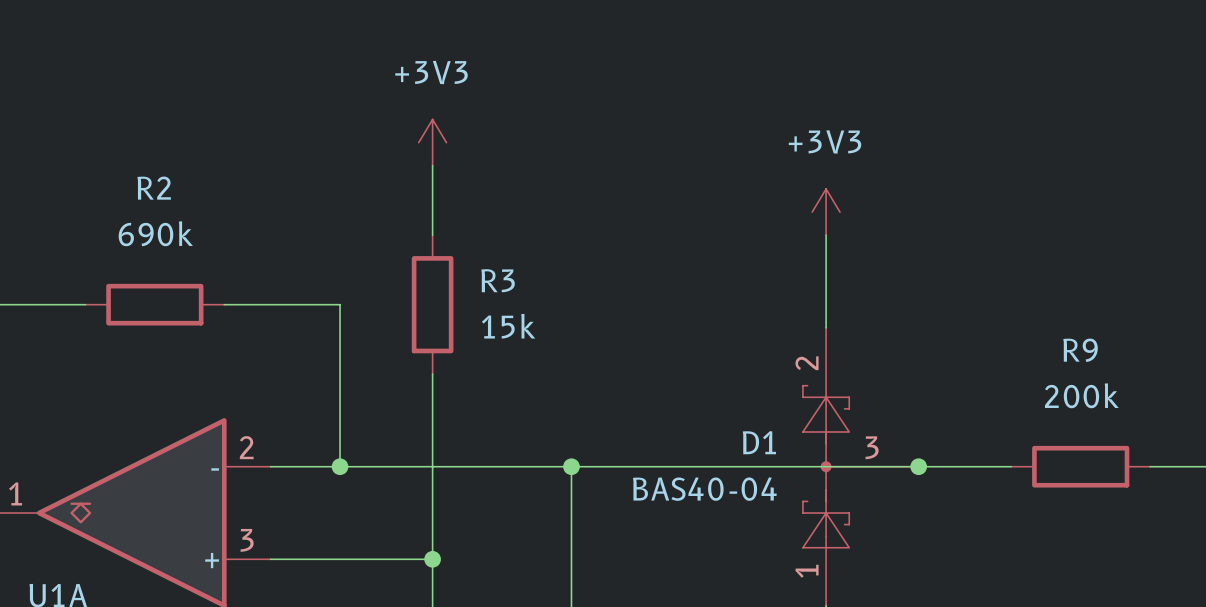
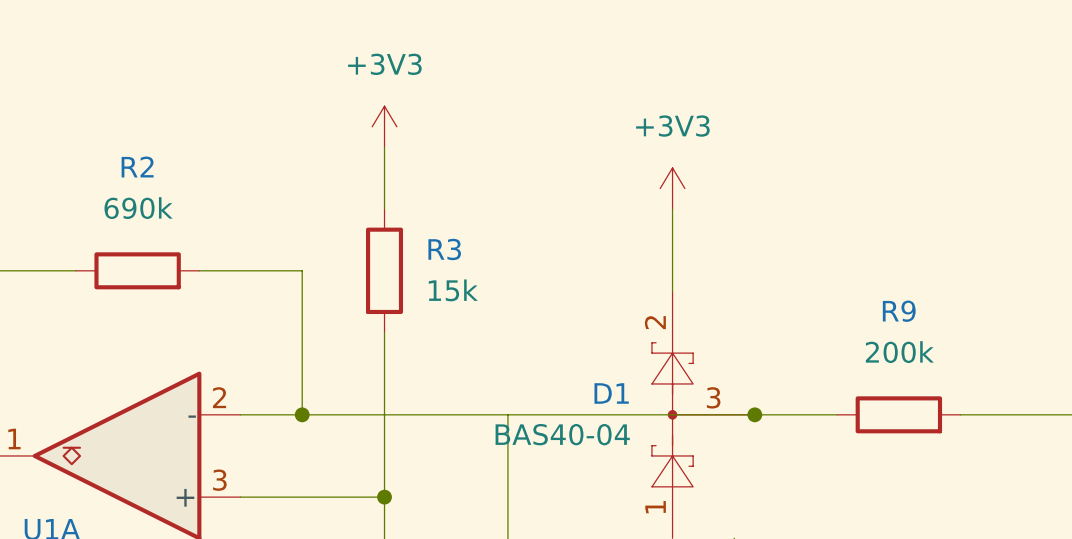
power symbol position: +3V3 (826, 212) -> +3V3 (672, 188)
wire: (826, 235) (826, 327) -> (672, 209) (672, 291)
junction: (571, 466) -> none
D1 position: (860, 466) -> (703, 414)
junction position: (918, 466) -> (754, 414)
wire: (941, 466) (1011, 466) -> (960, 414) (1022, 414)
R9 position: (1080, 466) -> (898, 414)

